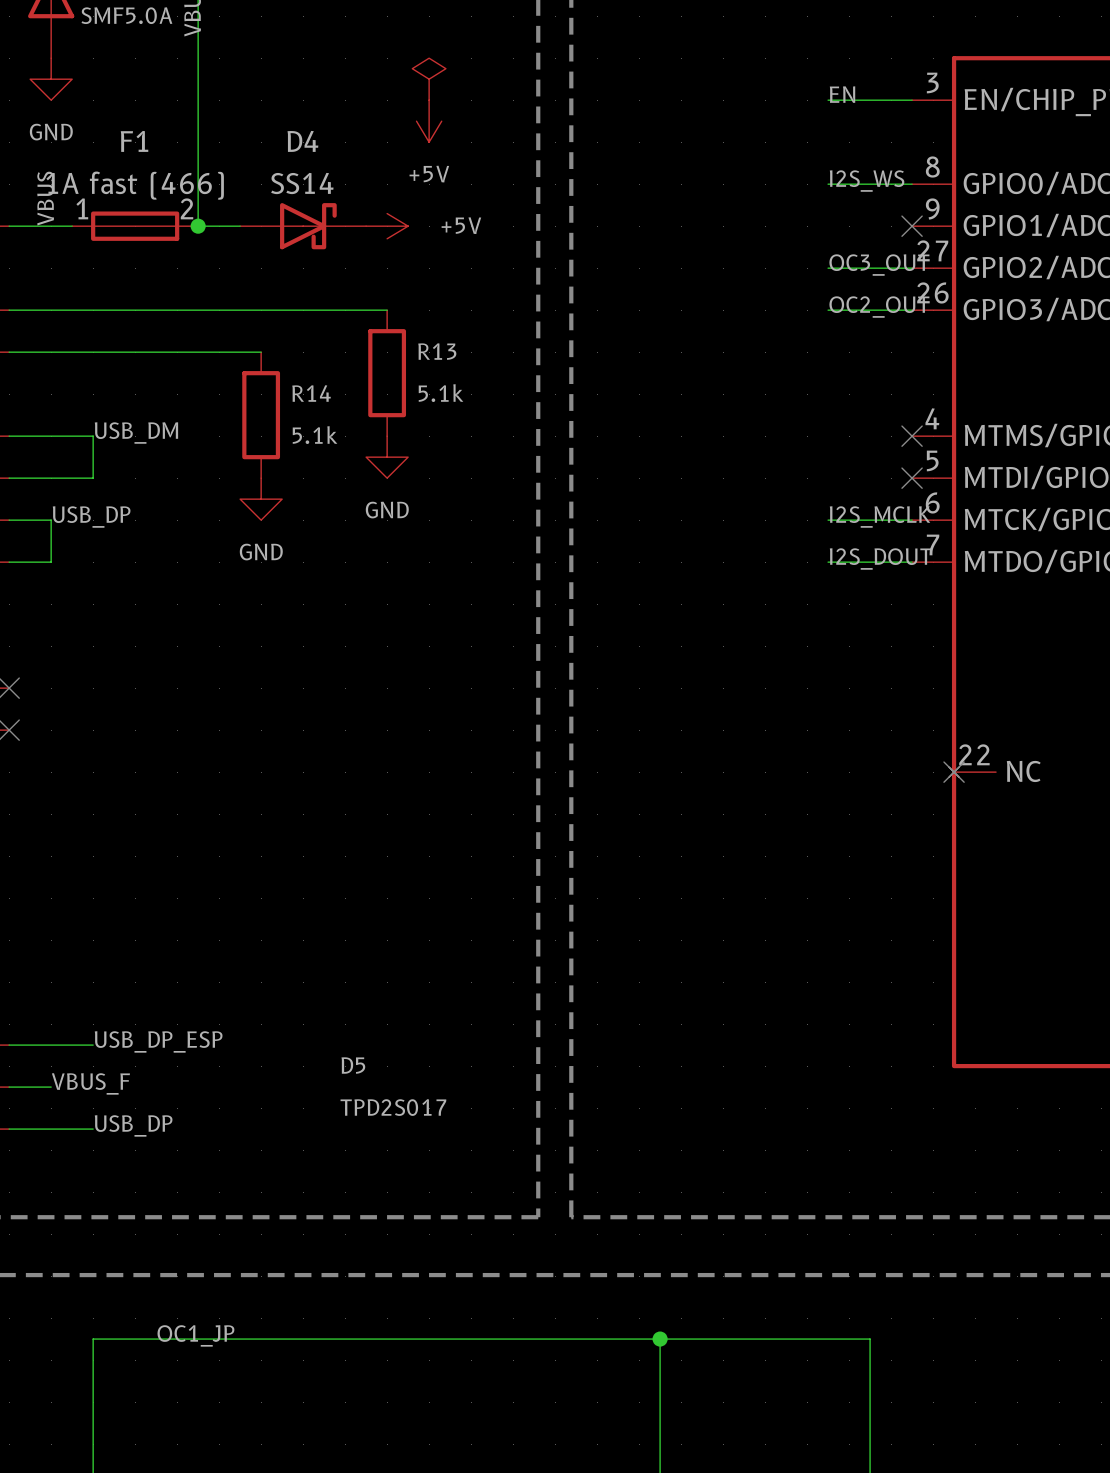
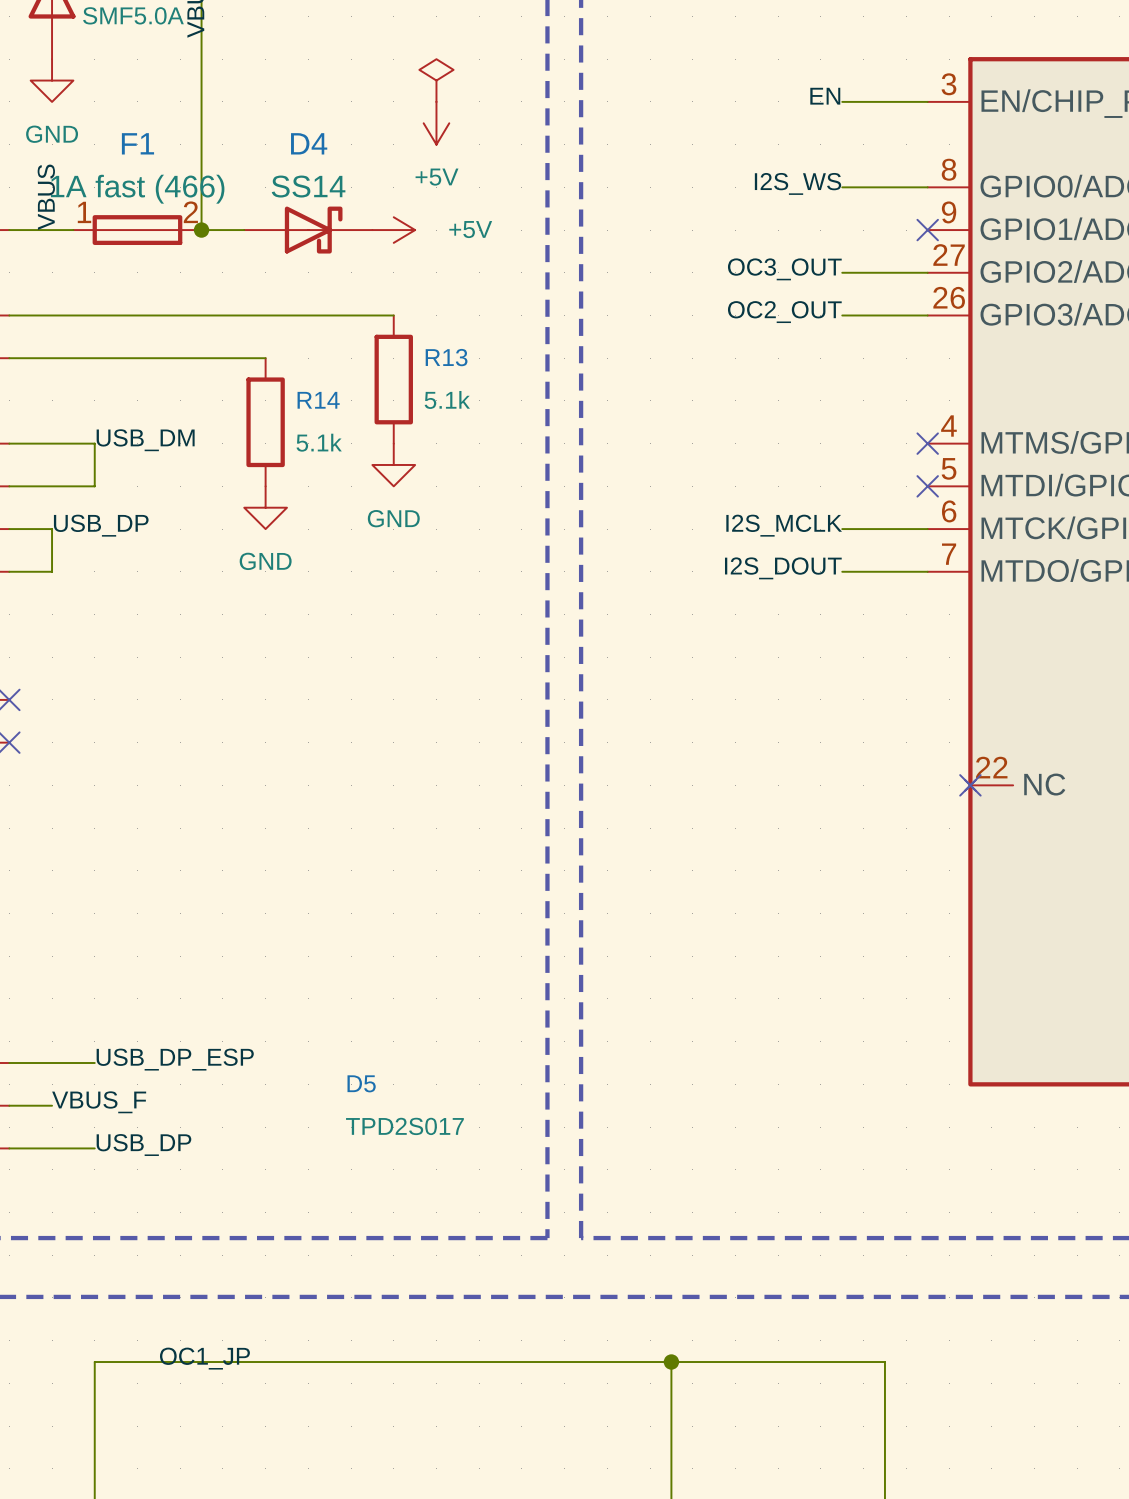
label position: EN (842, 94) -> EN (825, 96)
label position: I2S_WS (867, 181) -> I2S_WS (798, 183)
label position: OC3_OUT (879, 265) -> OC3_OUT (784, 269)
label position: OC2_OUT (879, 307) -> OC2_OUT (784, 312)
label position: I2S_MCLK (880, 517) -> I2S_MCLK (784, 525)
label position: I2S_DOUT (880, 559) -> I2S_DOUT (783, 568)

